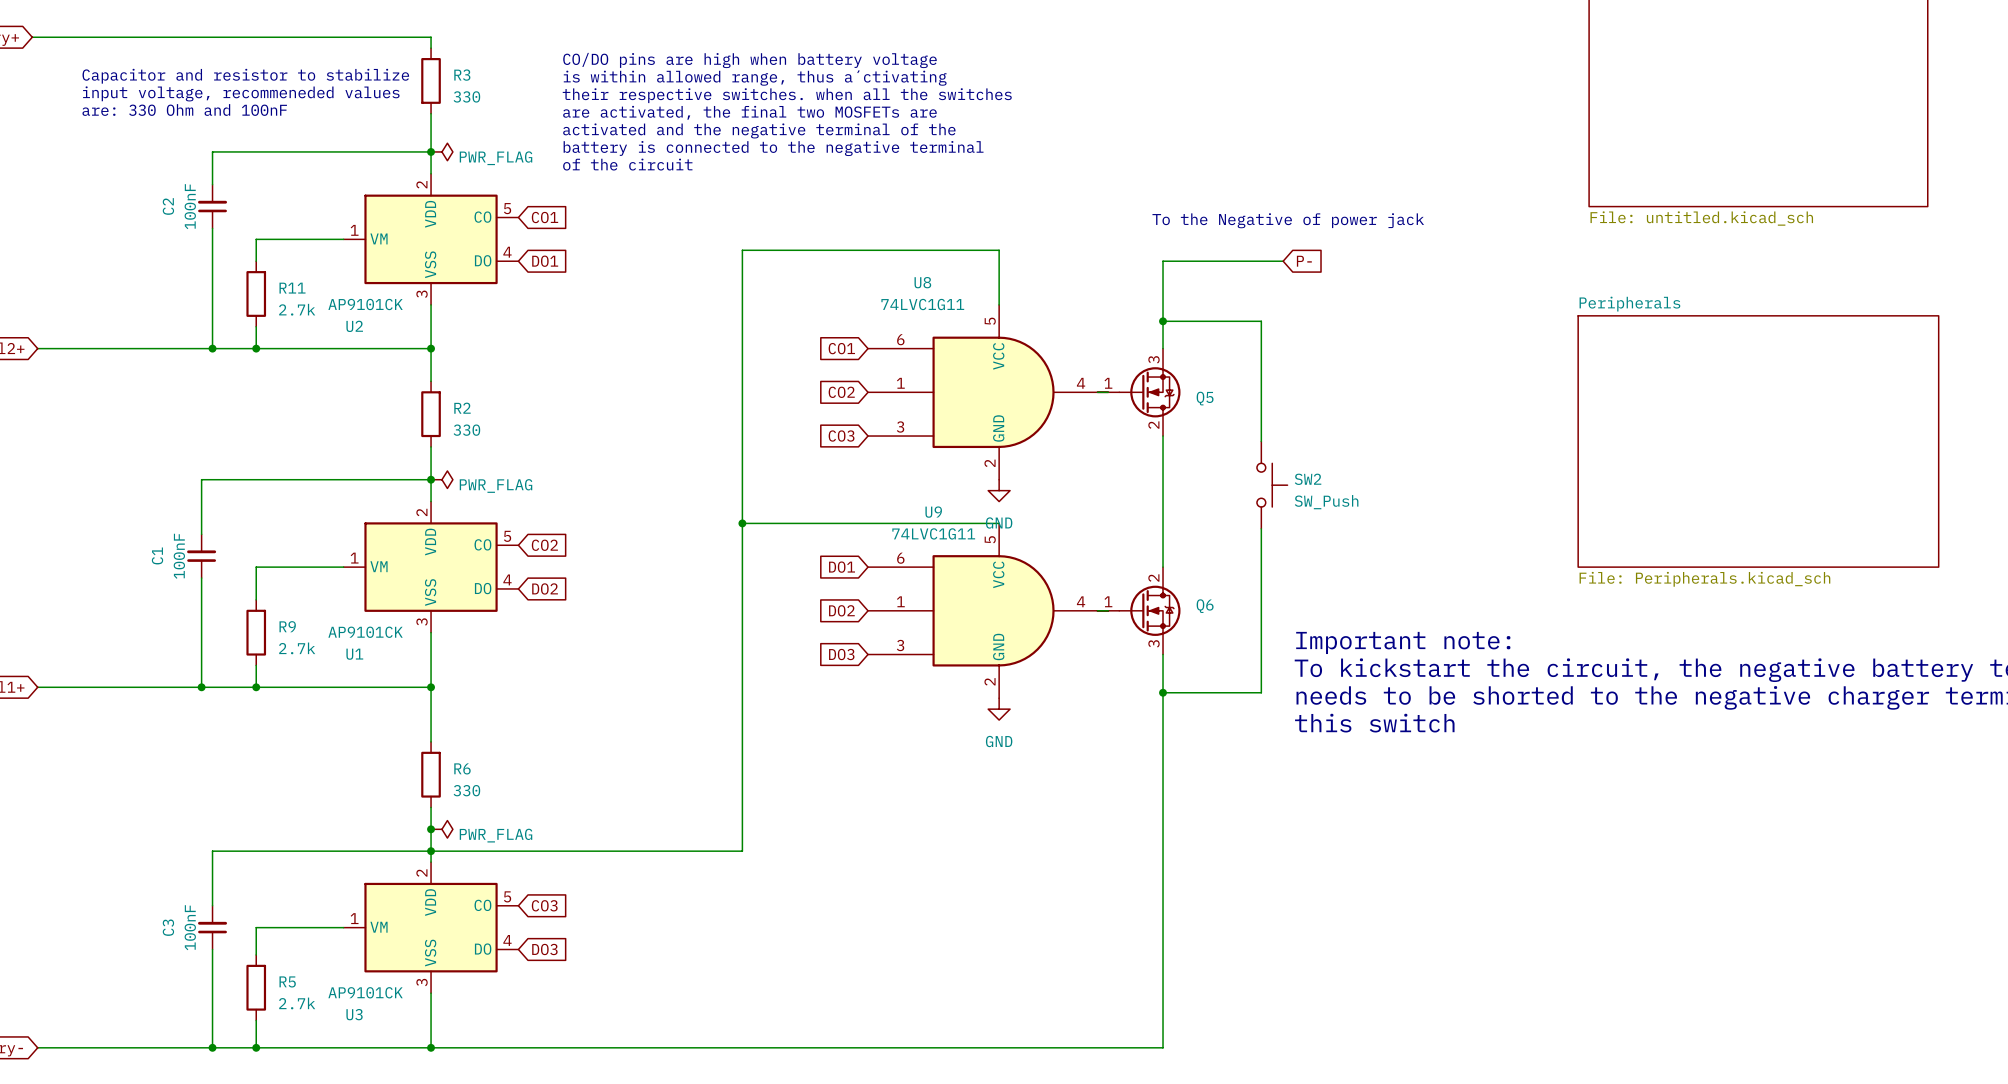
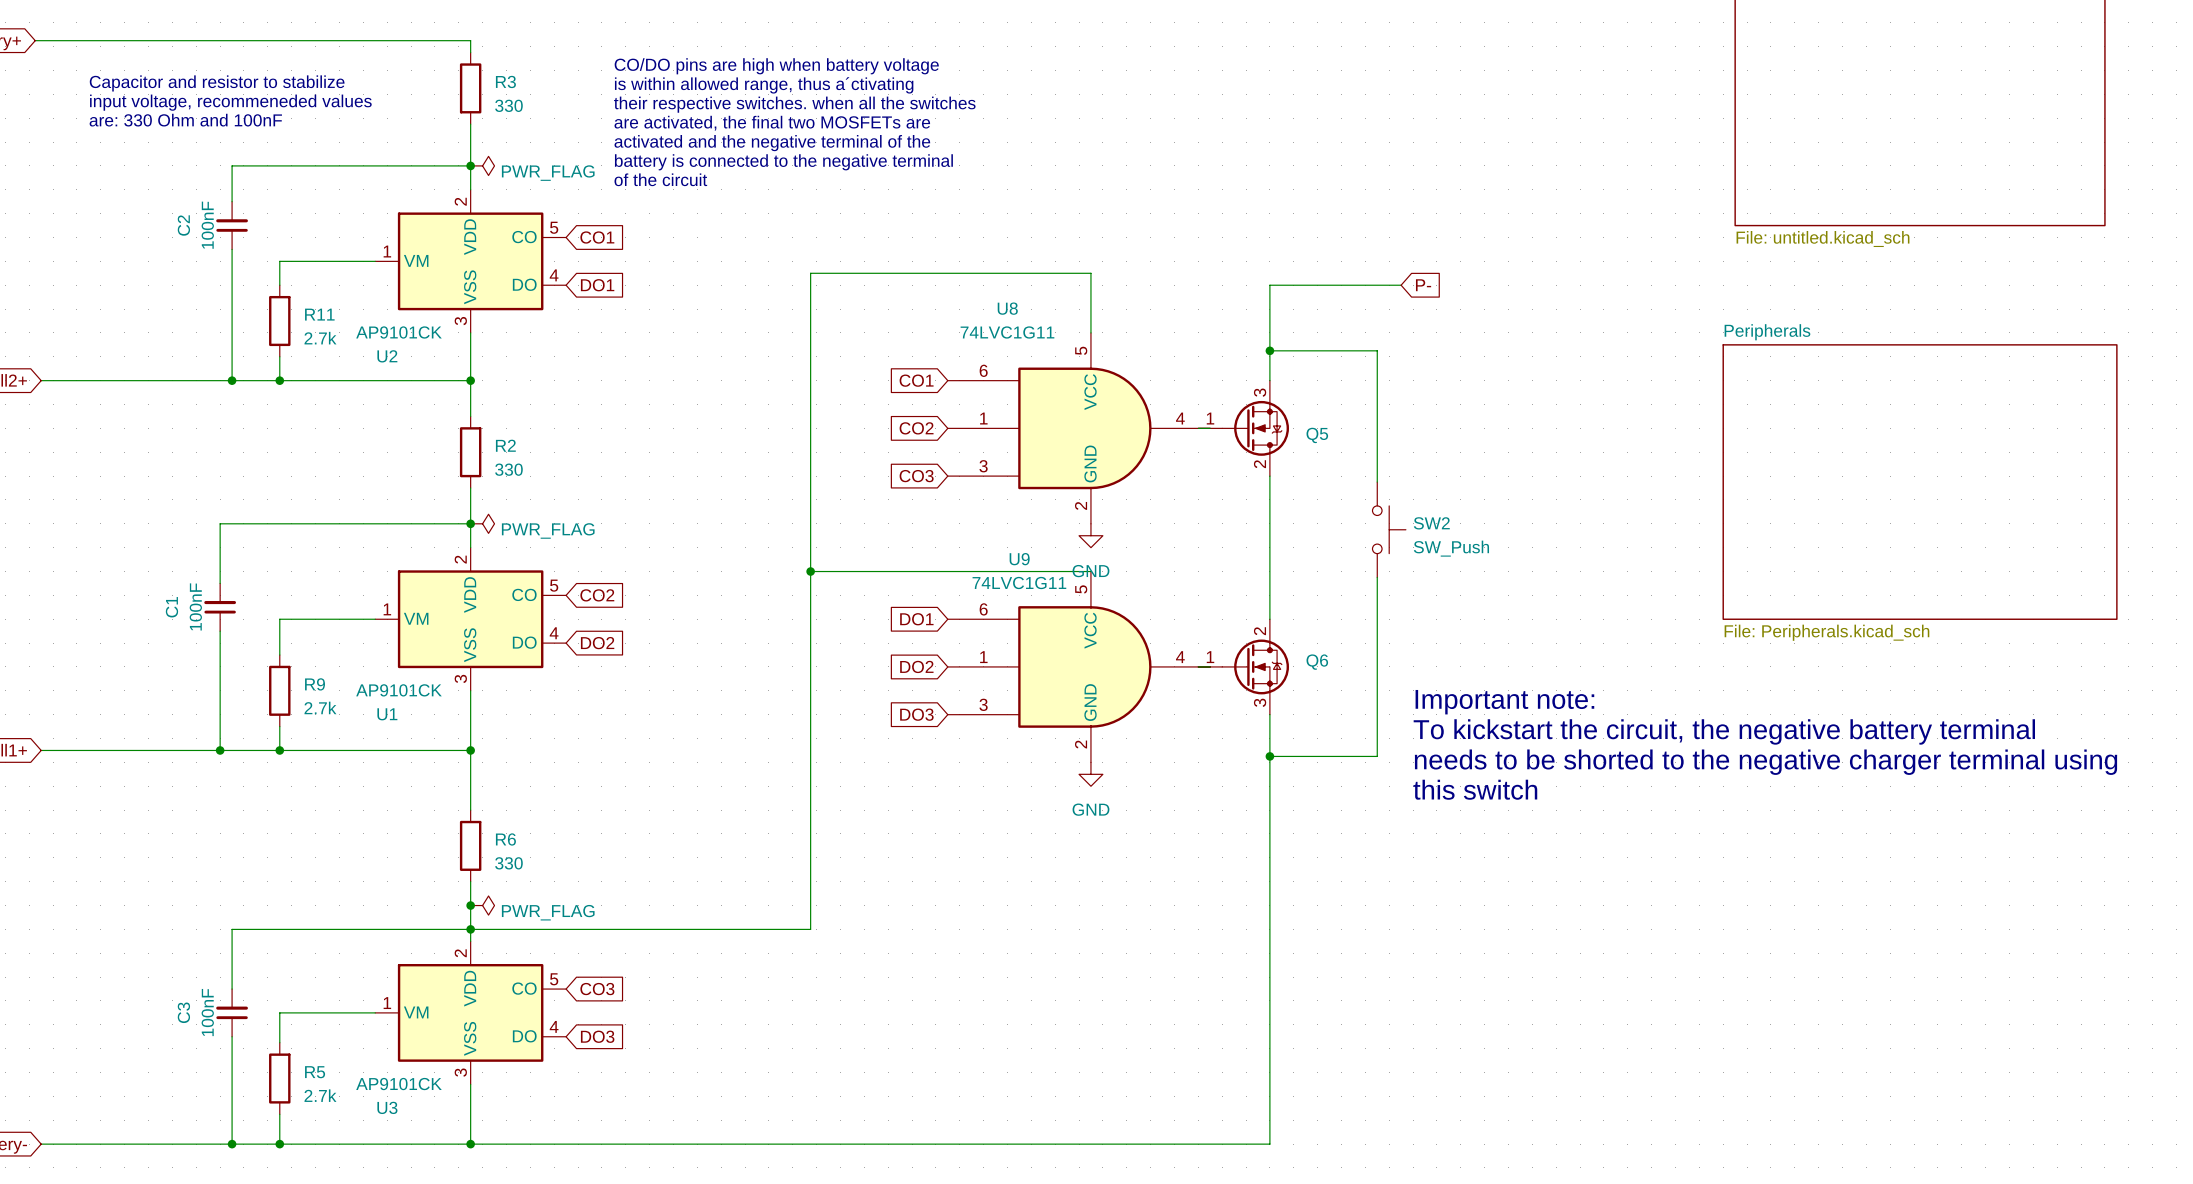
text: To the Negative of power jack (1288, 220) -> none

